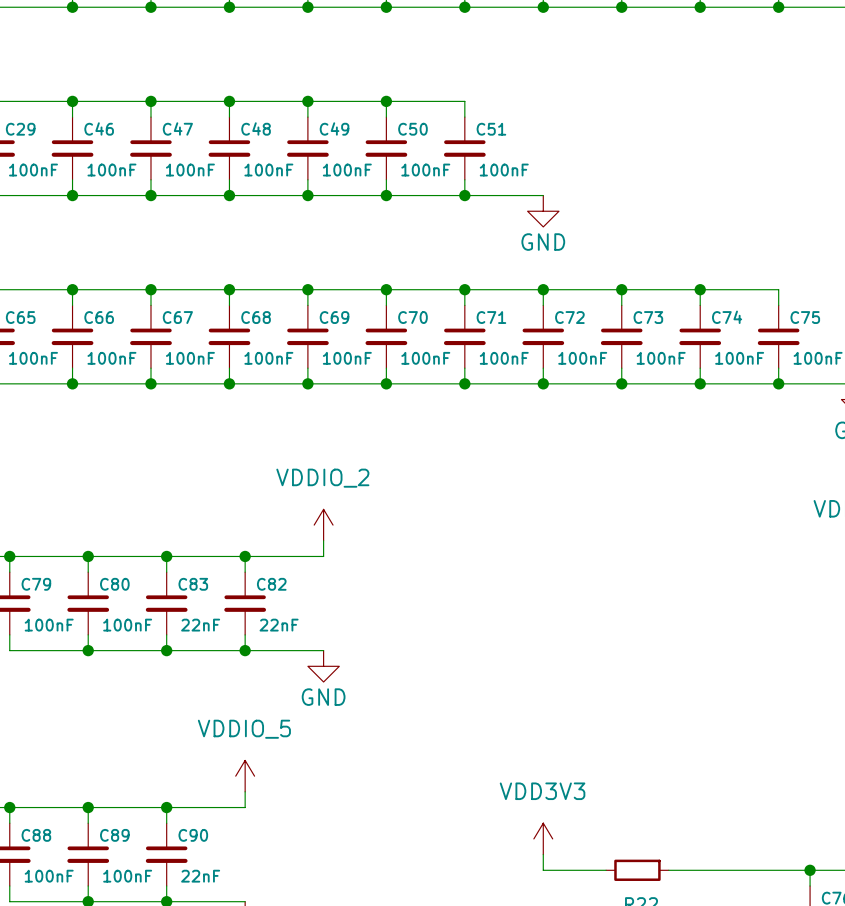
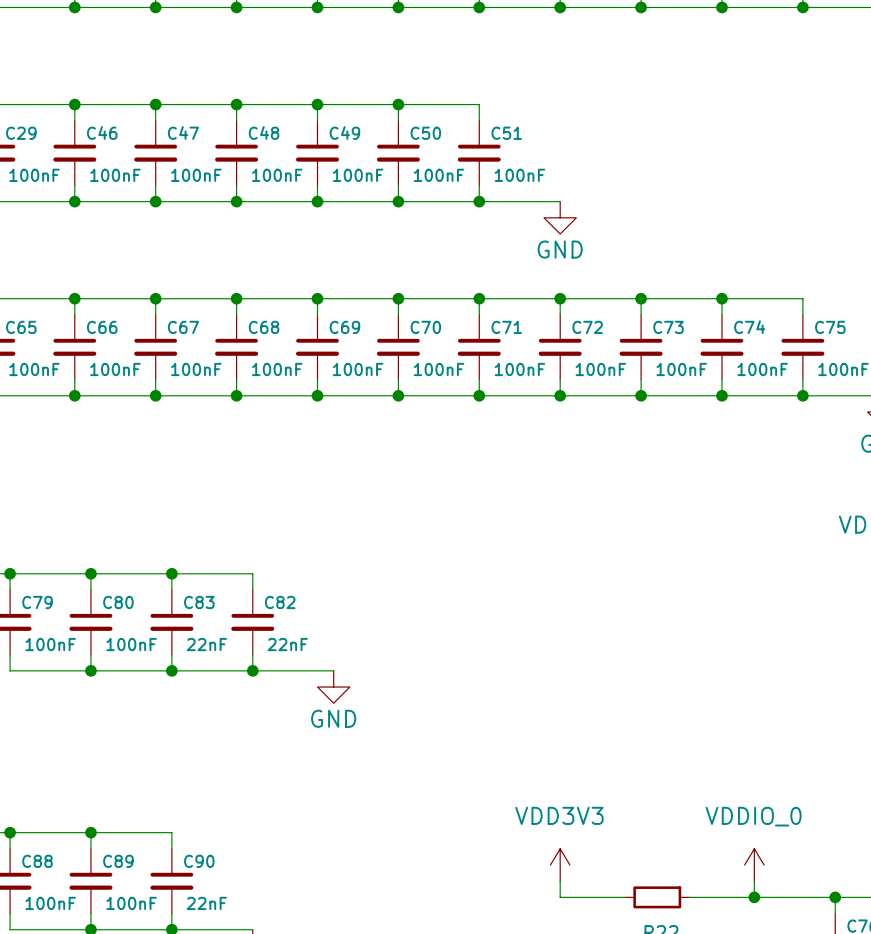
power symbol: VDDIO_2 (323, 525) -> none
wire: (323, 540) (323, 556) (245, 556) -> none
junction: (245, 556) -> none
power symbol: VDDIO_5 (245, 776) -> none
wire: (245, 791) (245, 807) (166, 807) -> none
junction: (166, 807) -> none
power symbol: none -> VDDIO_0 (754, 865)
wire: none -> (754, 881) (754, 897)
junction: none -> (754, 897)

